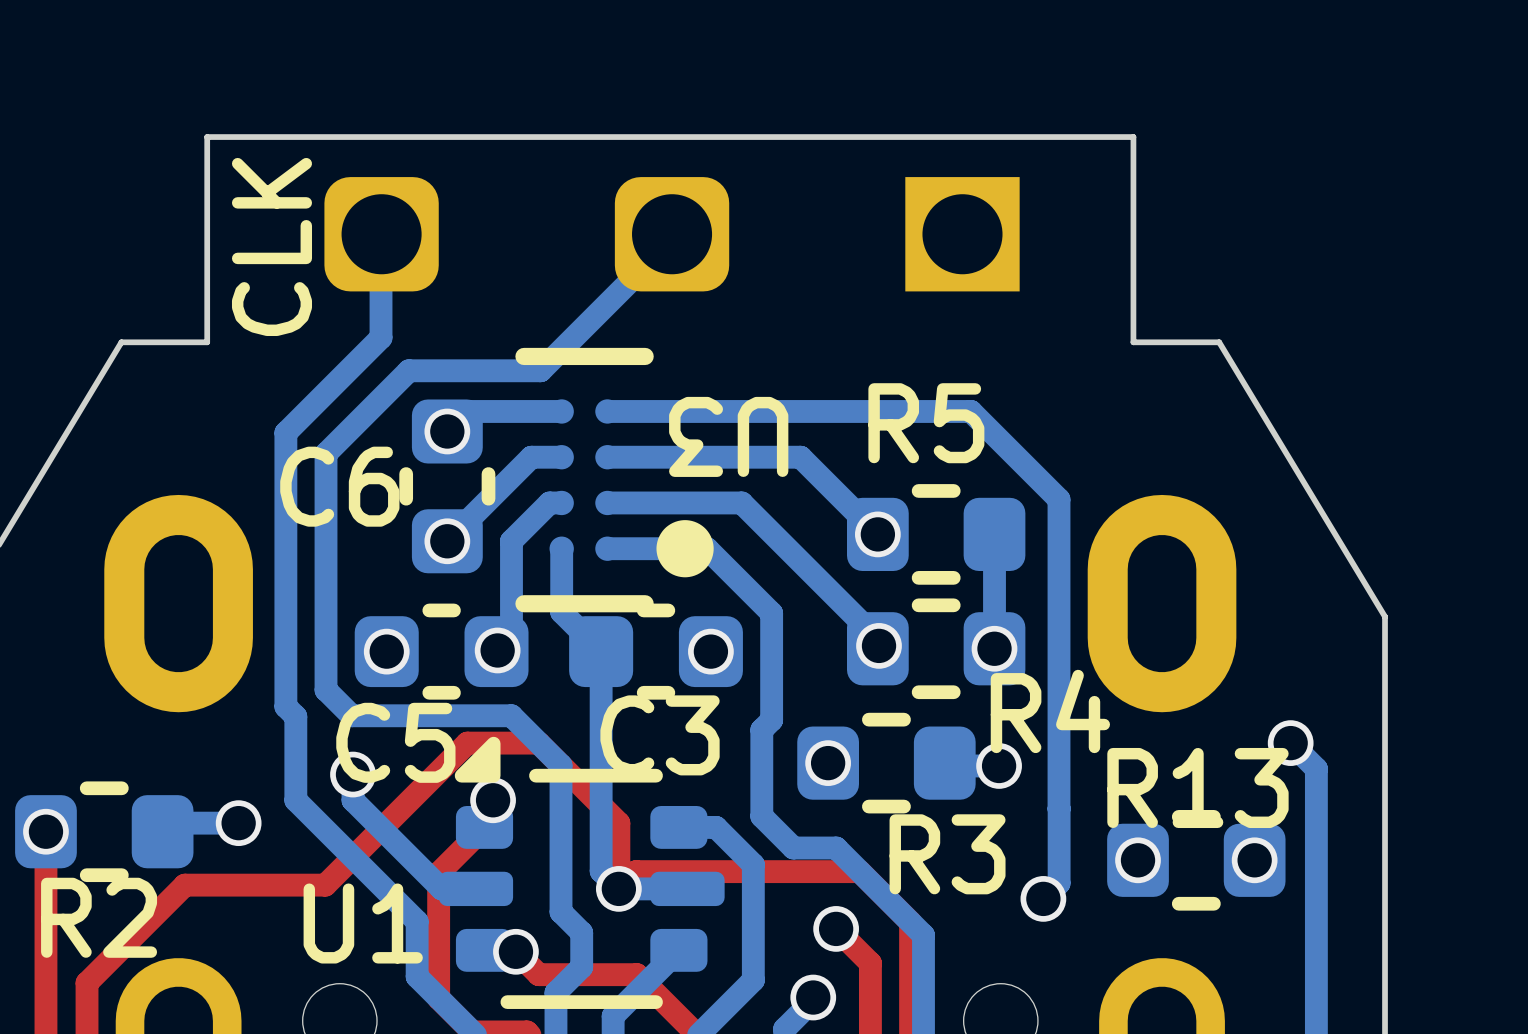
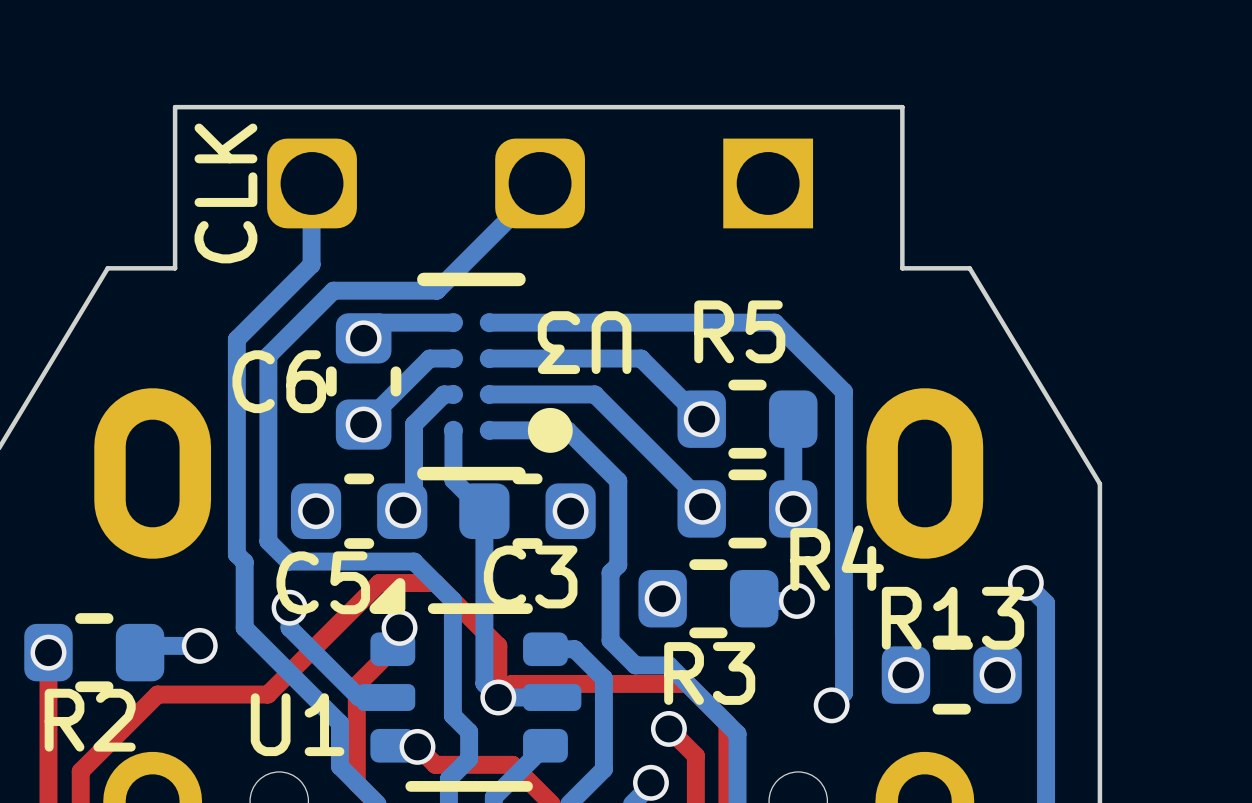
R3 name position: R3 (947, 854) -> R3 (709, 673)

